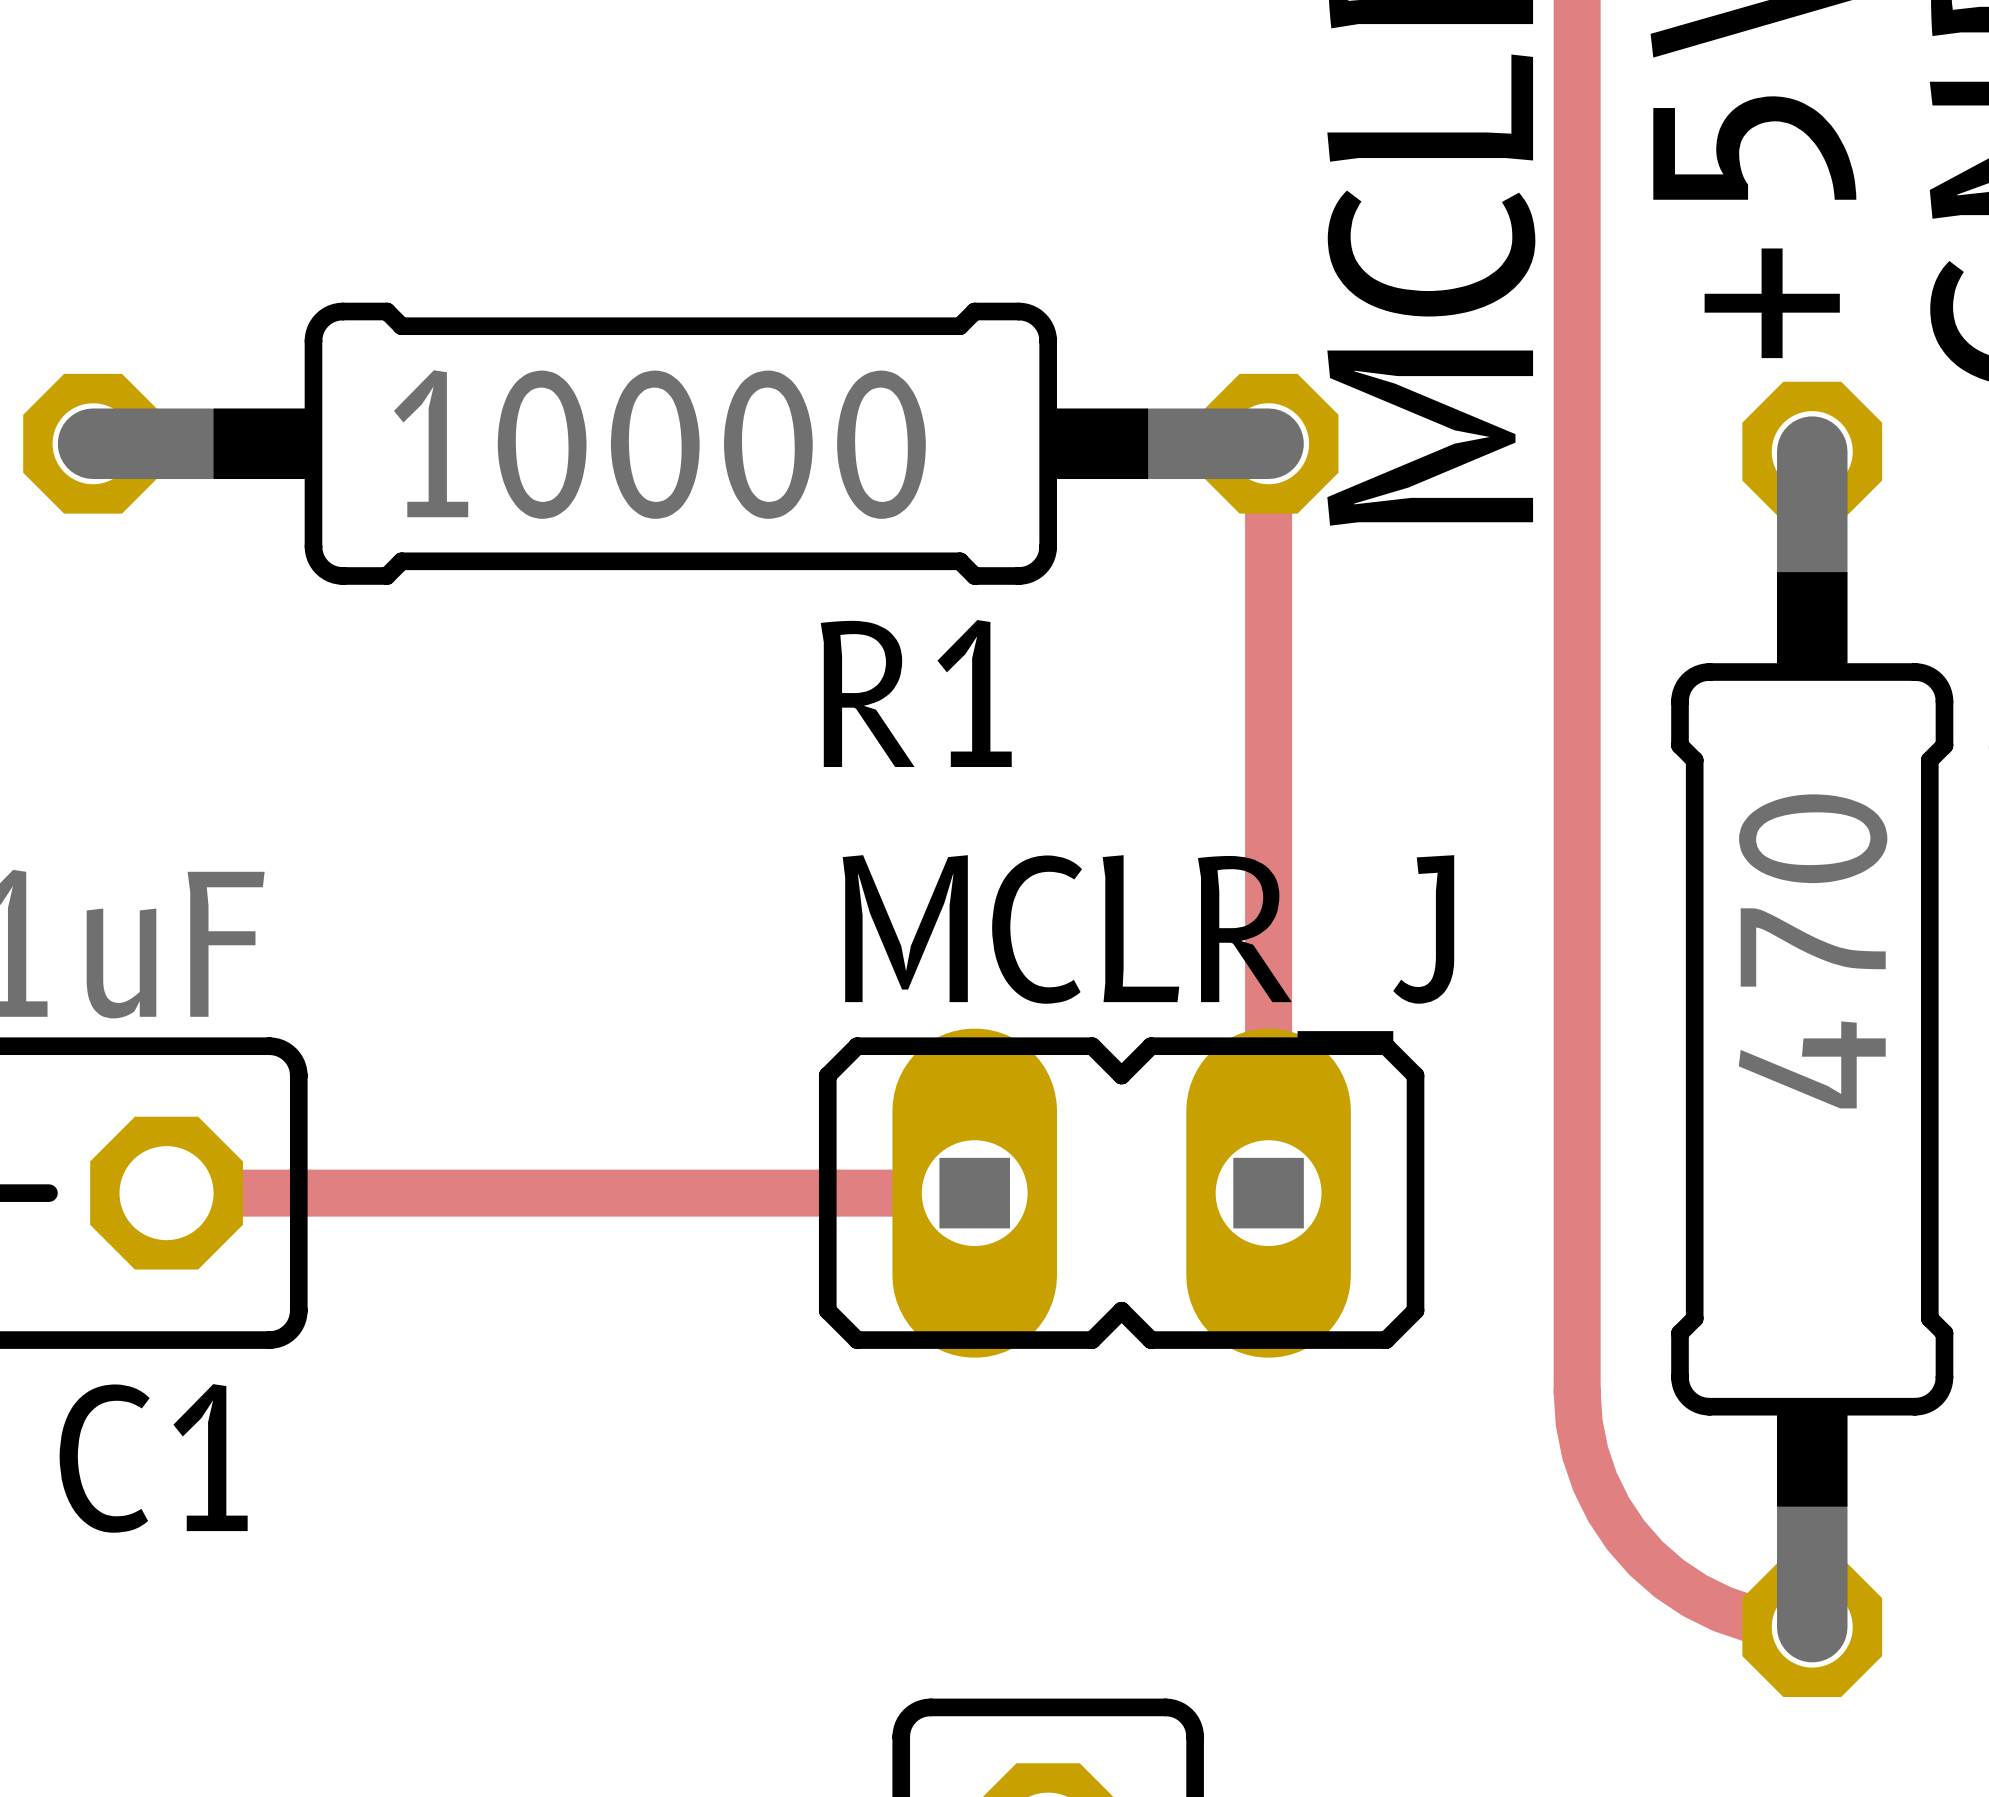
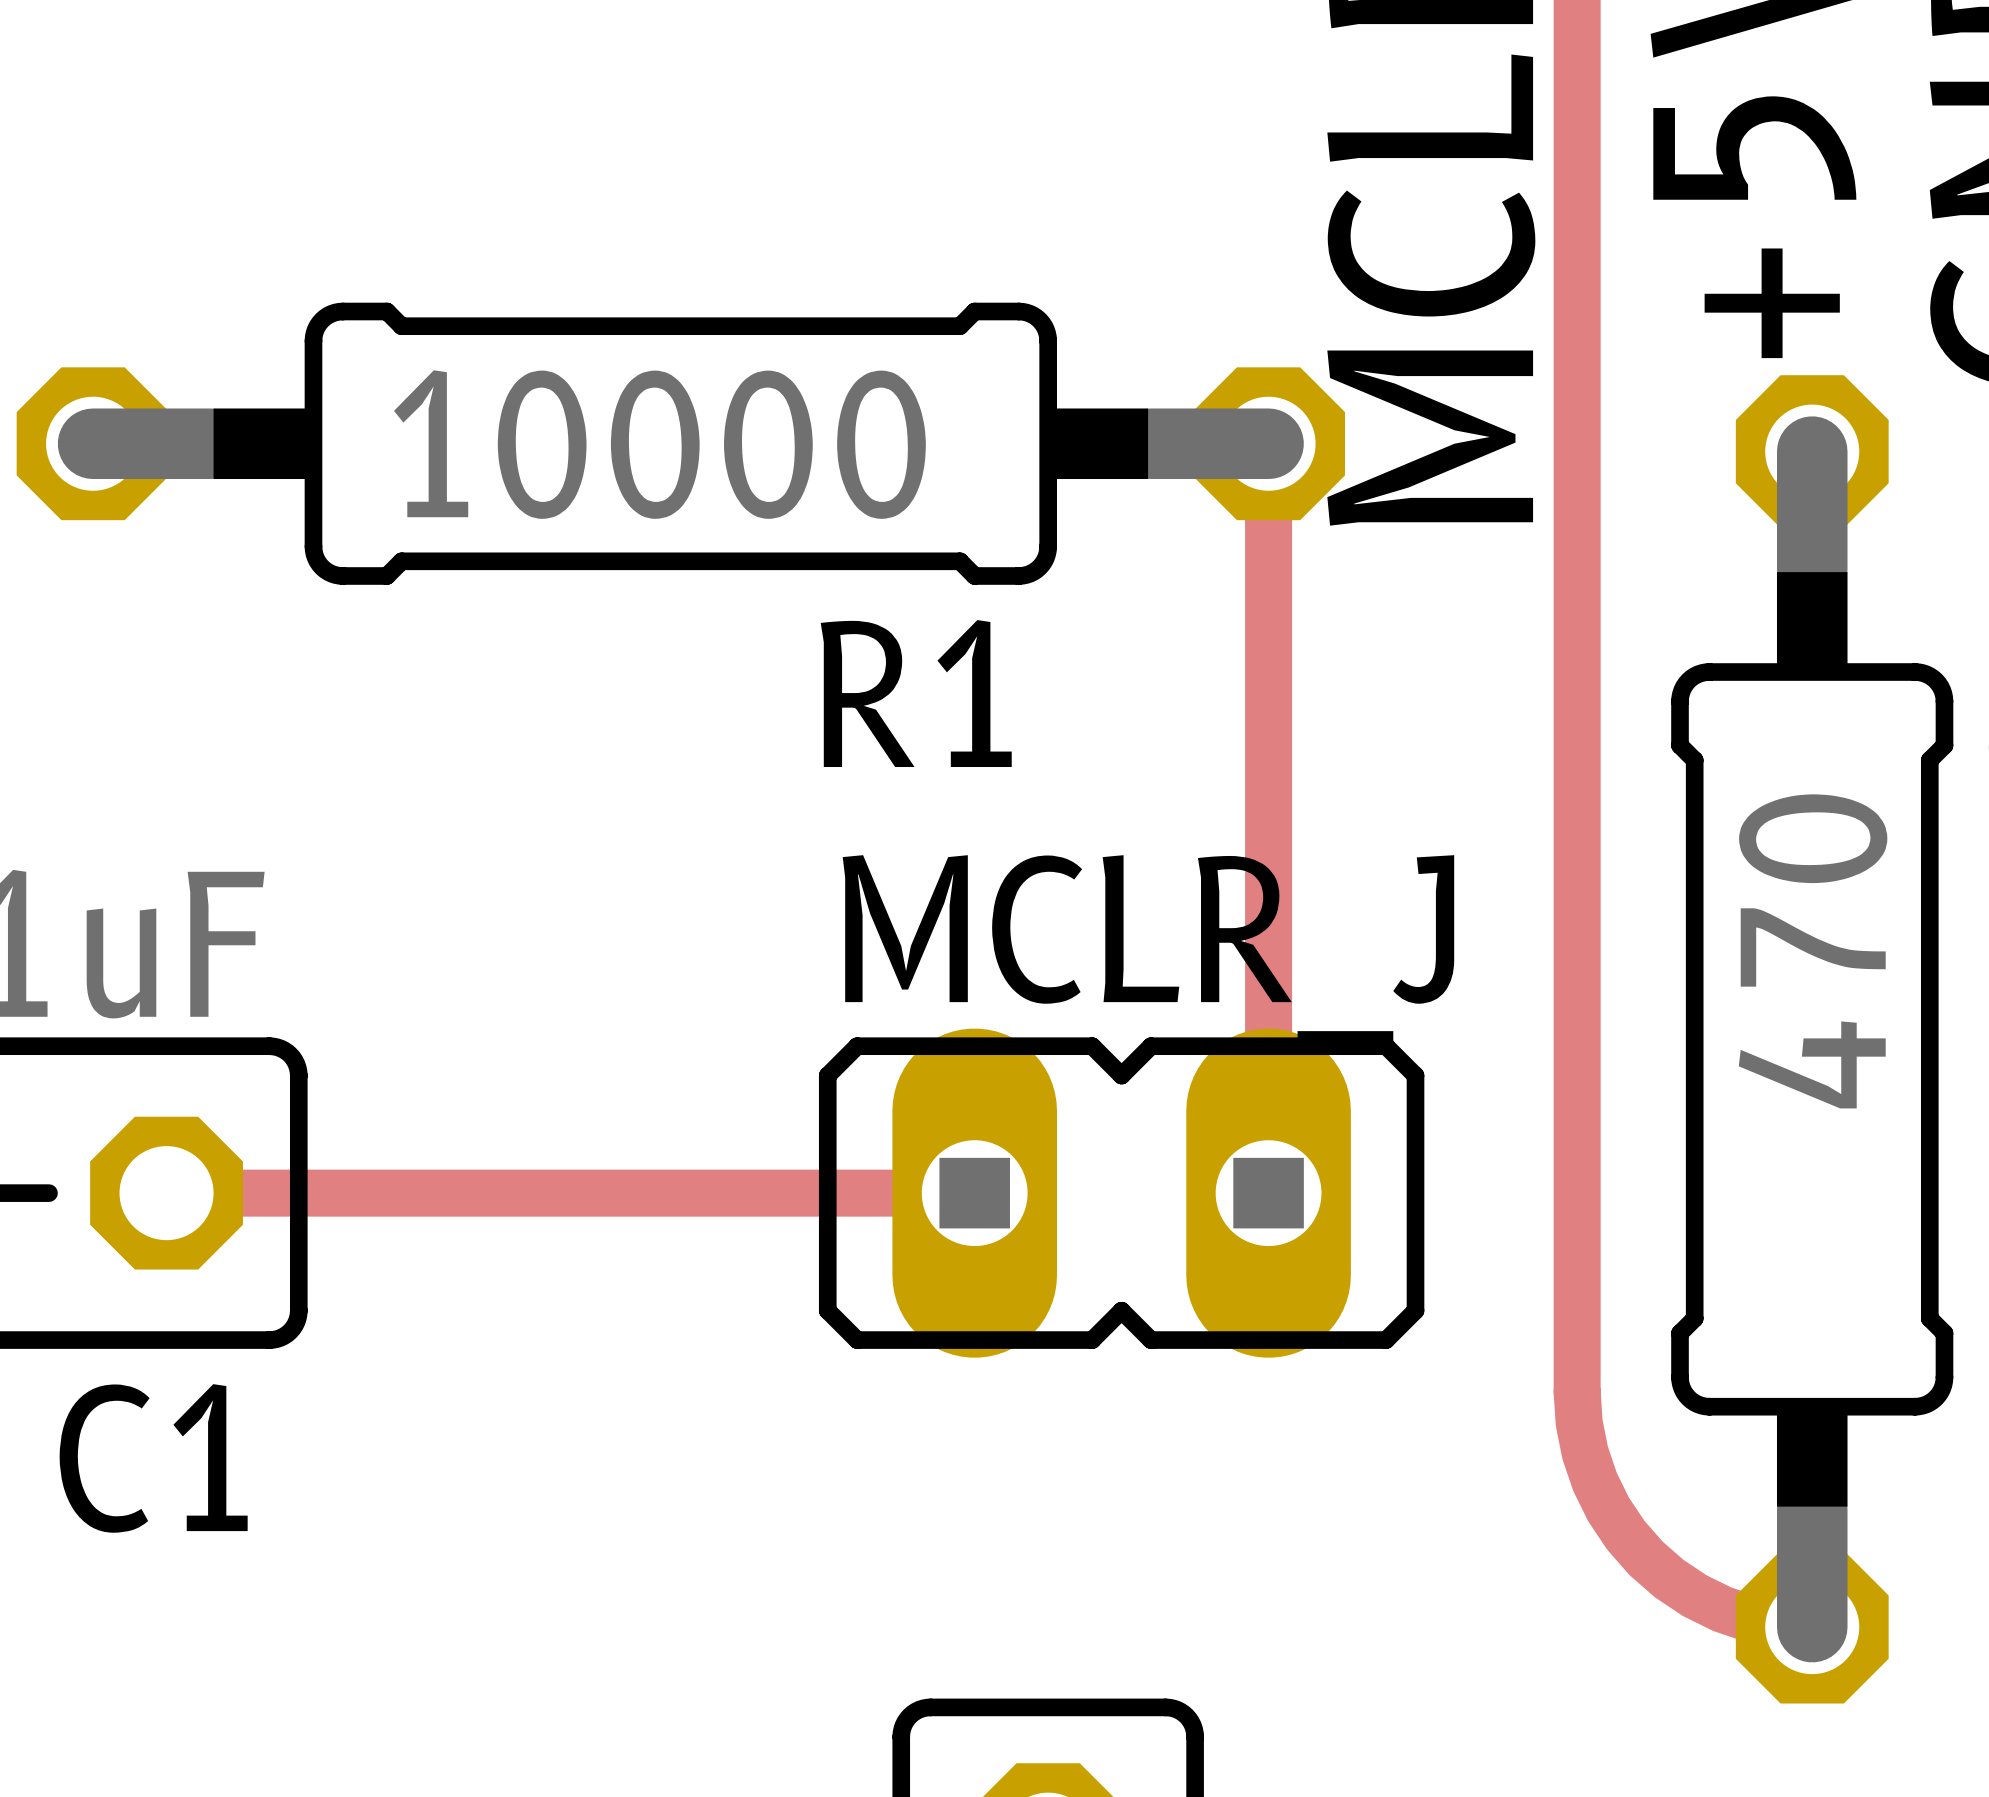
R1 footprint: [23, 302, 1339, 585] -> [16, 302, 1345, 585]
part footprint: [1671, 381, 1954, 1698] -> [1671, 375, 1954, 1704]

